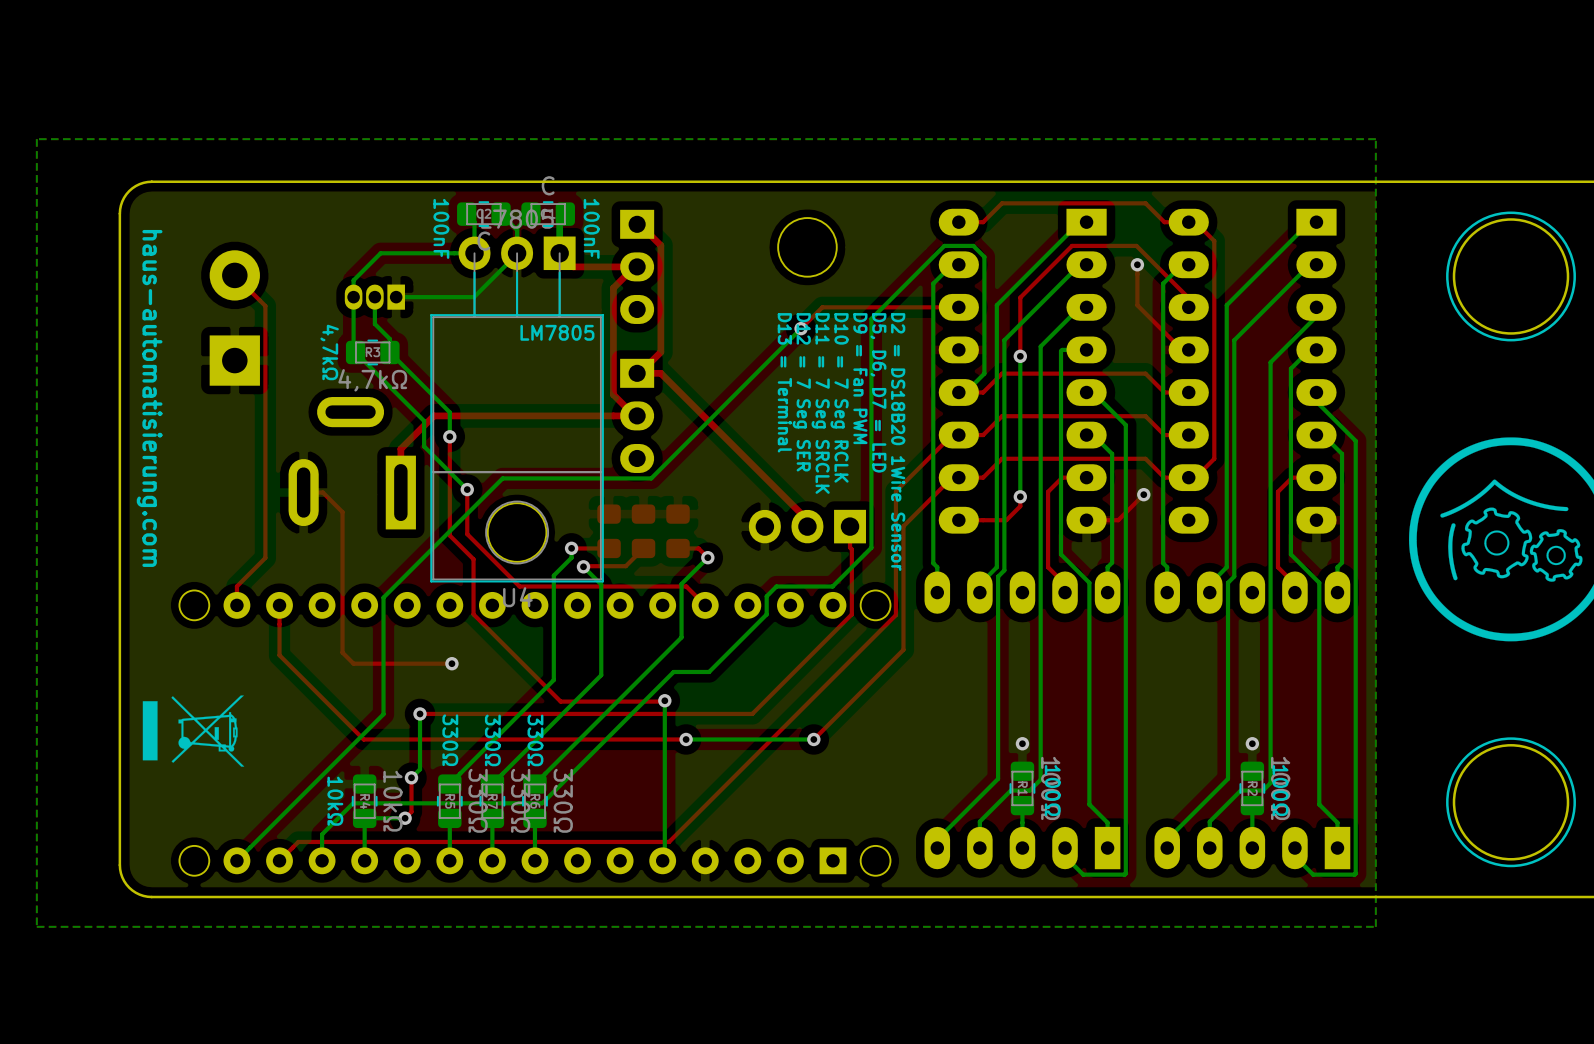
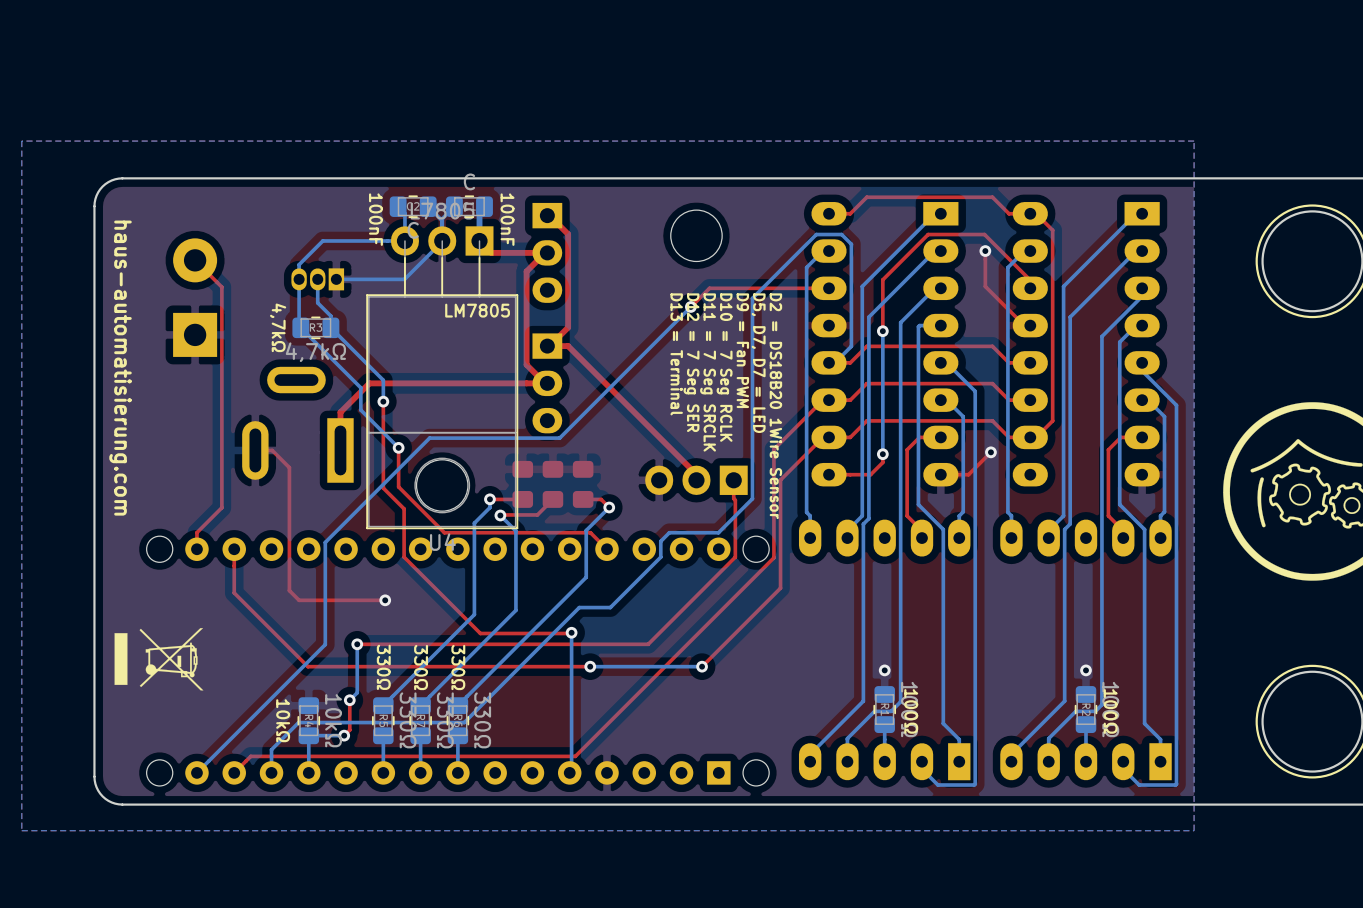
text: D5, D6, D7 = LED (878, 392) -> D5, D7, D7 = LED (758, 363)

